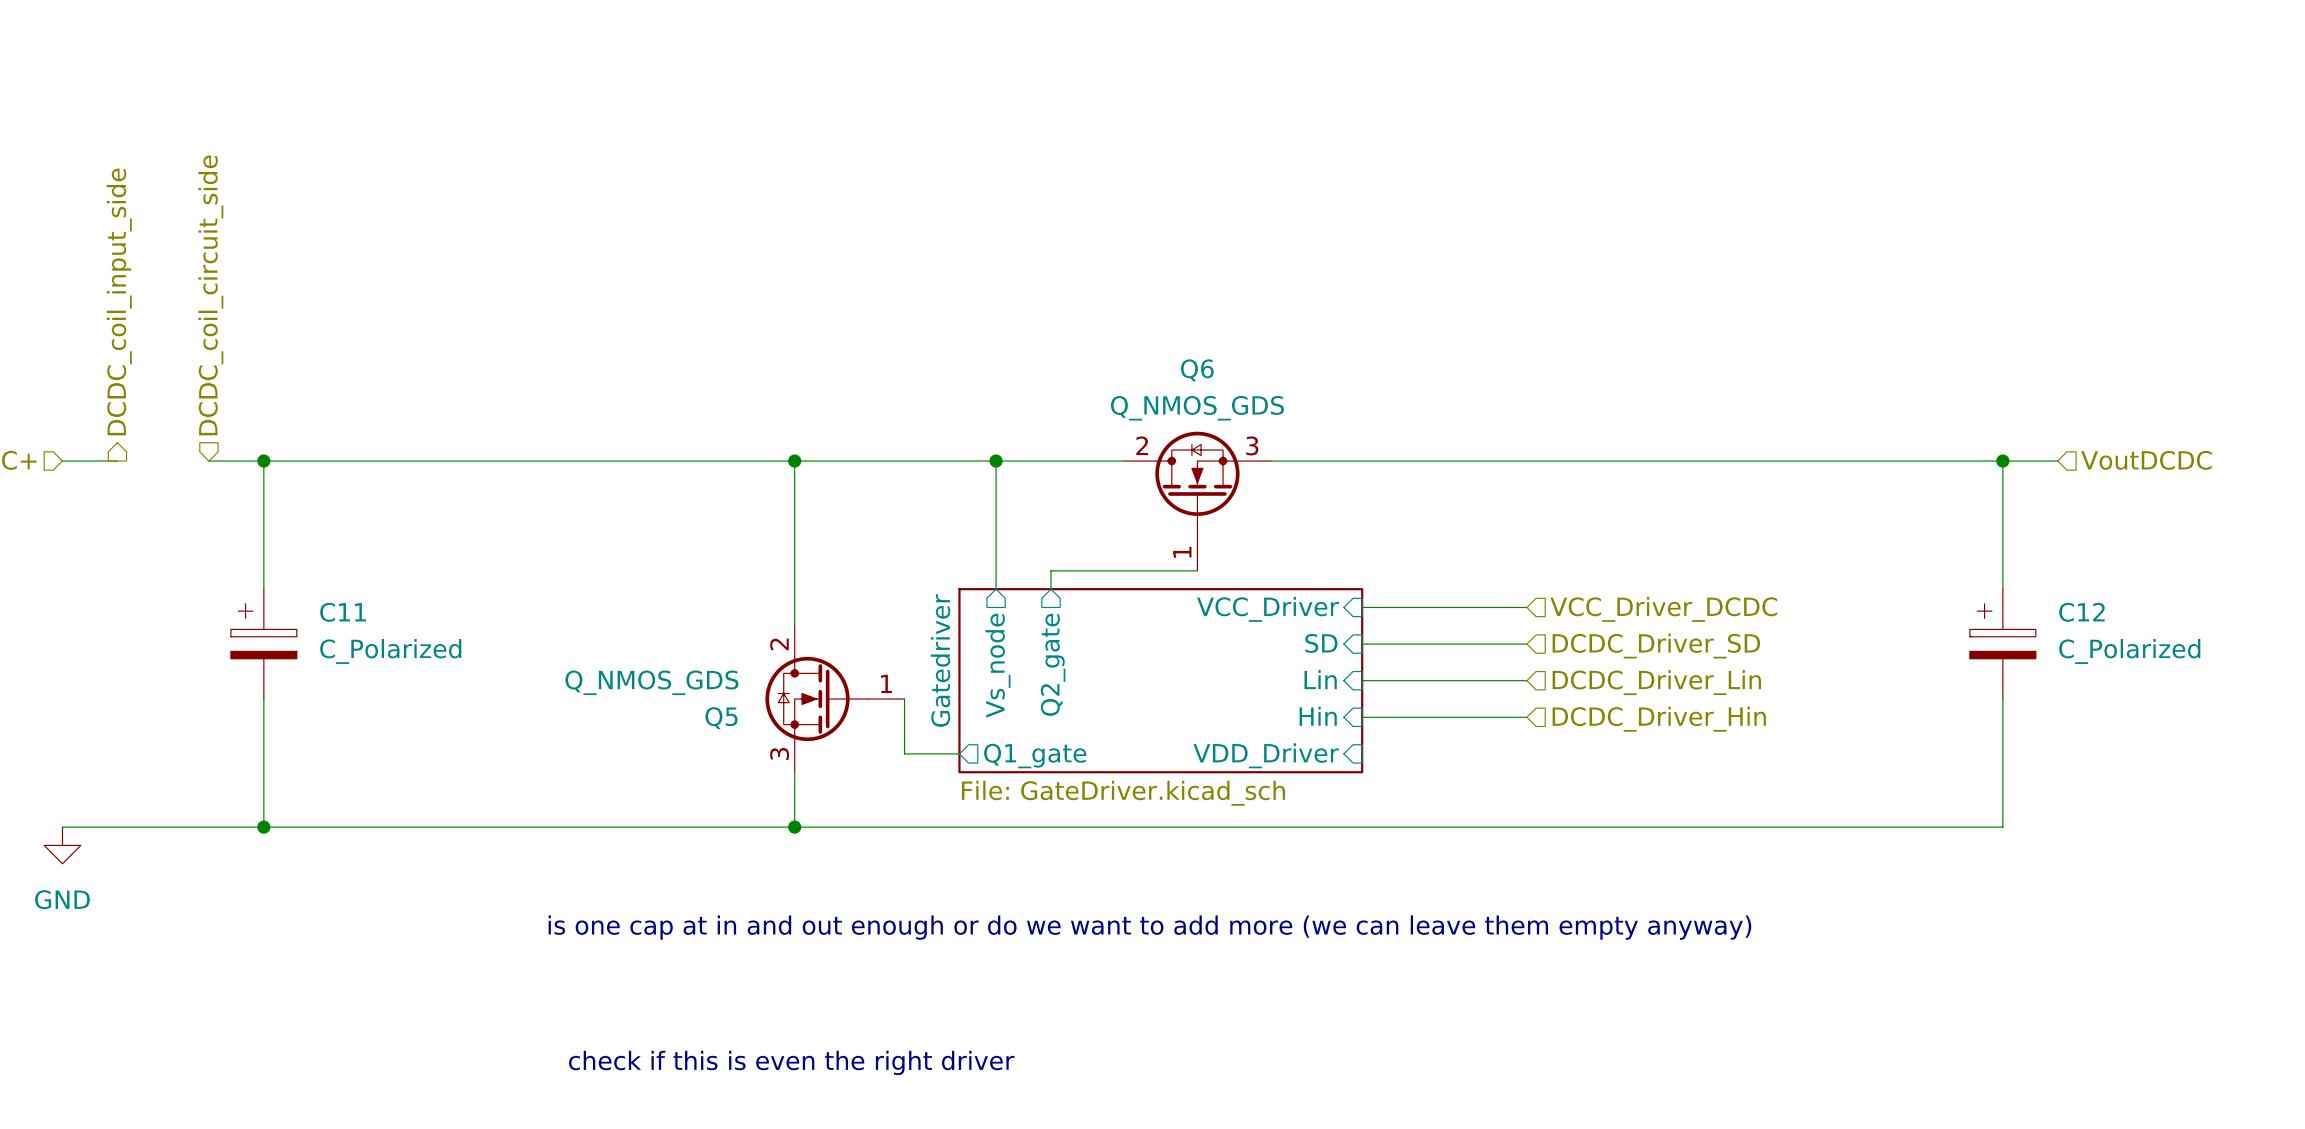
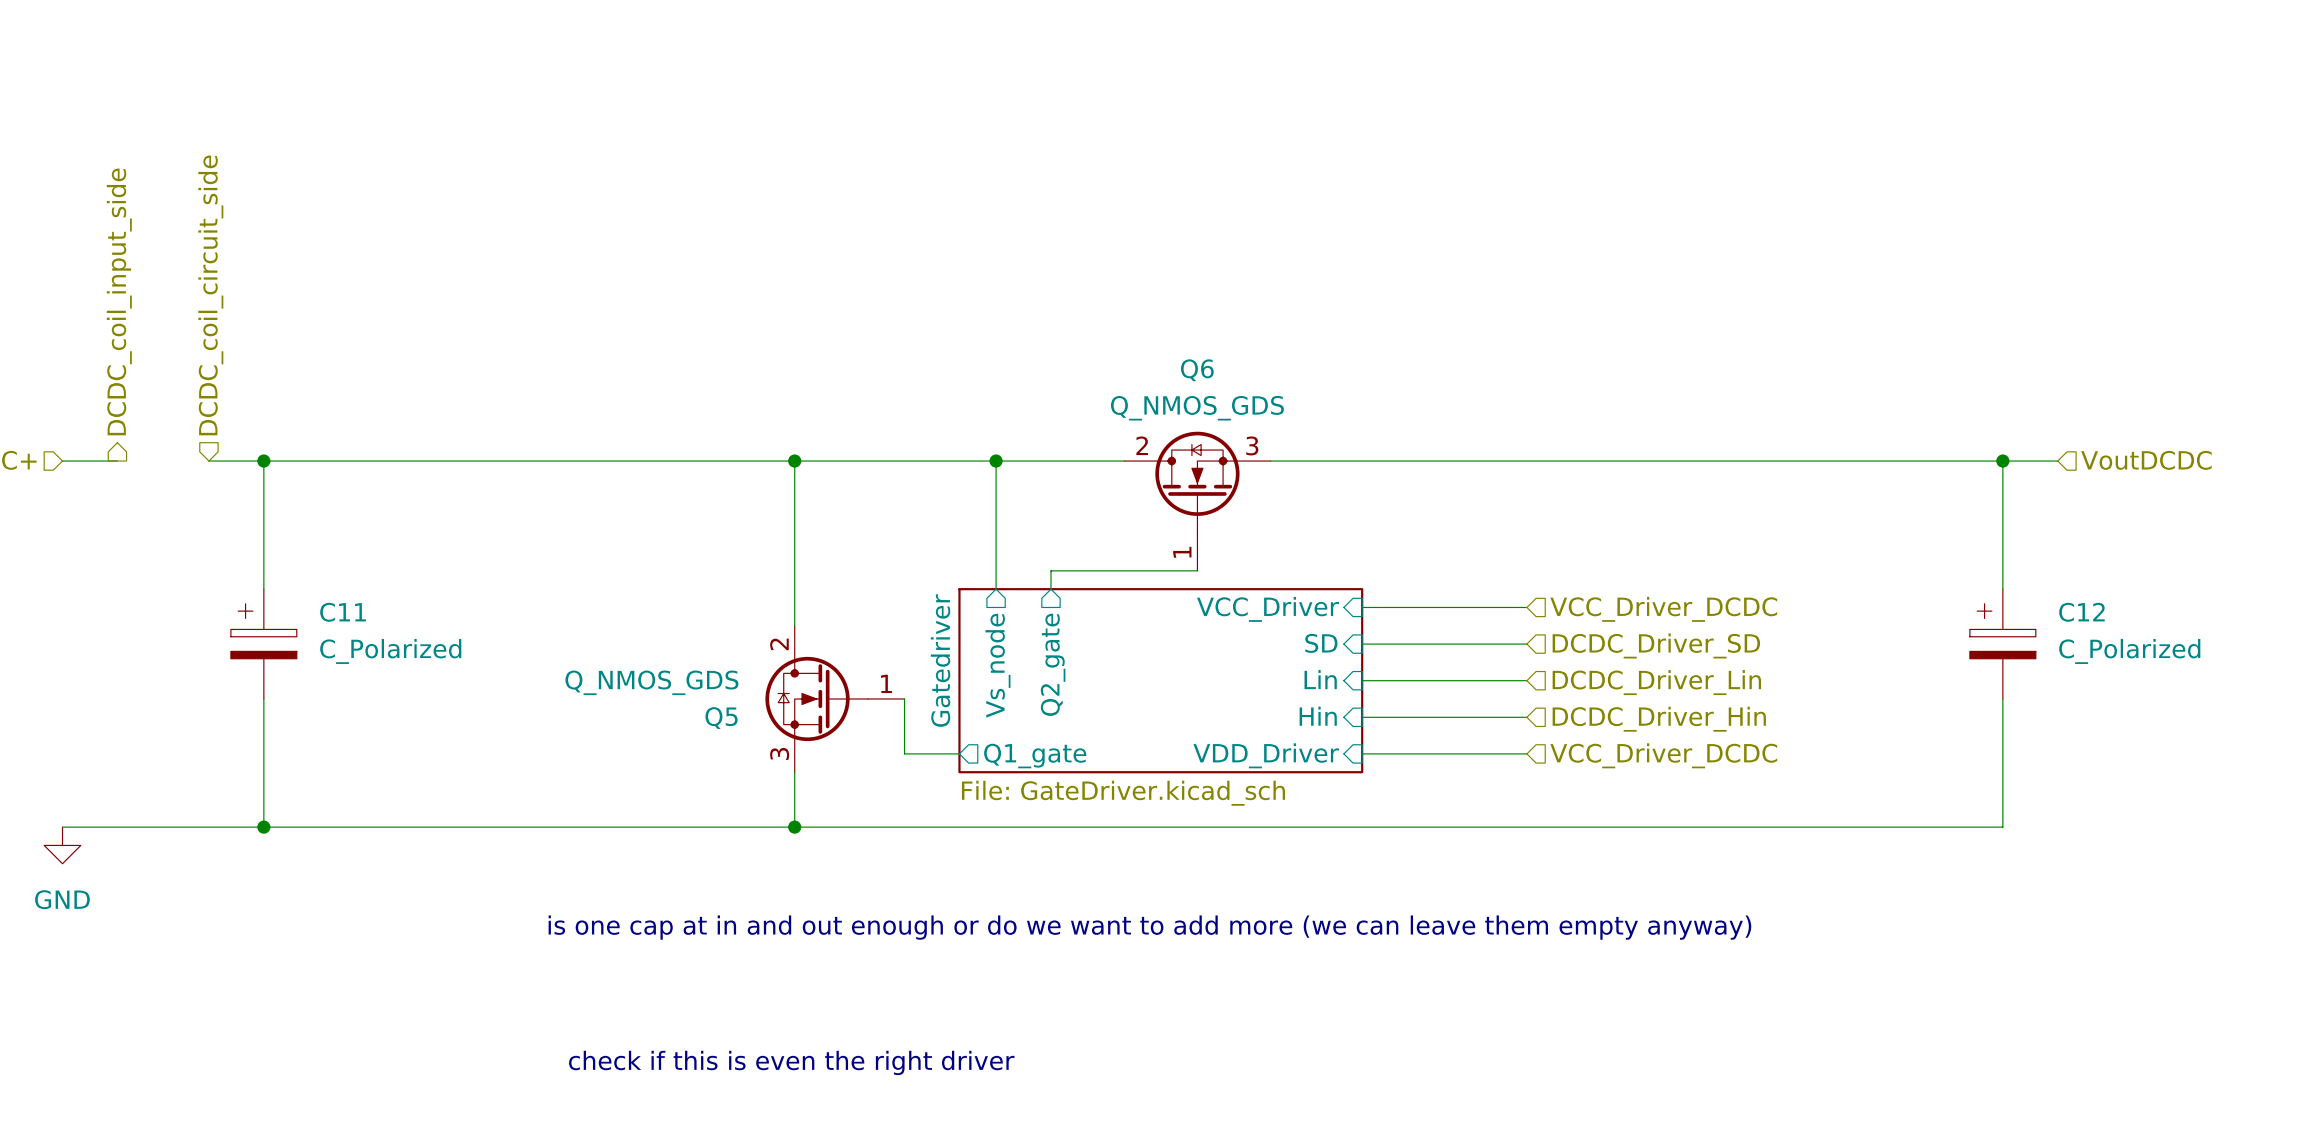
wire: none -> (1362, 753) (1526, 753)
hierarchical label: none -> VCC_Driver_DCDC (1663, 755)

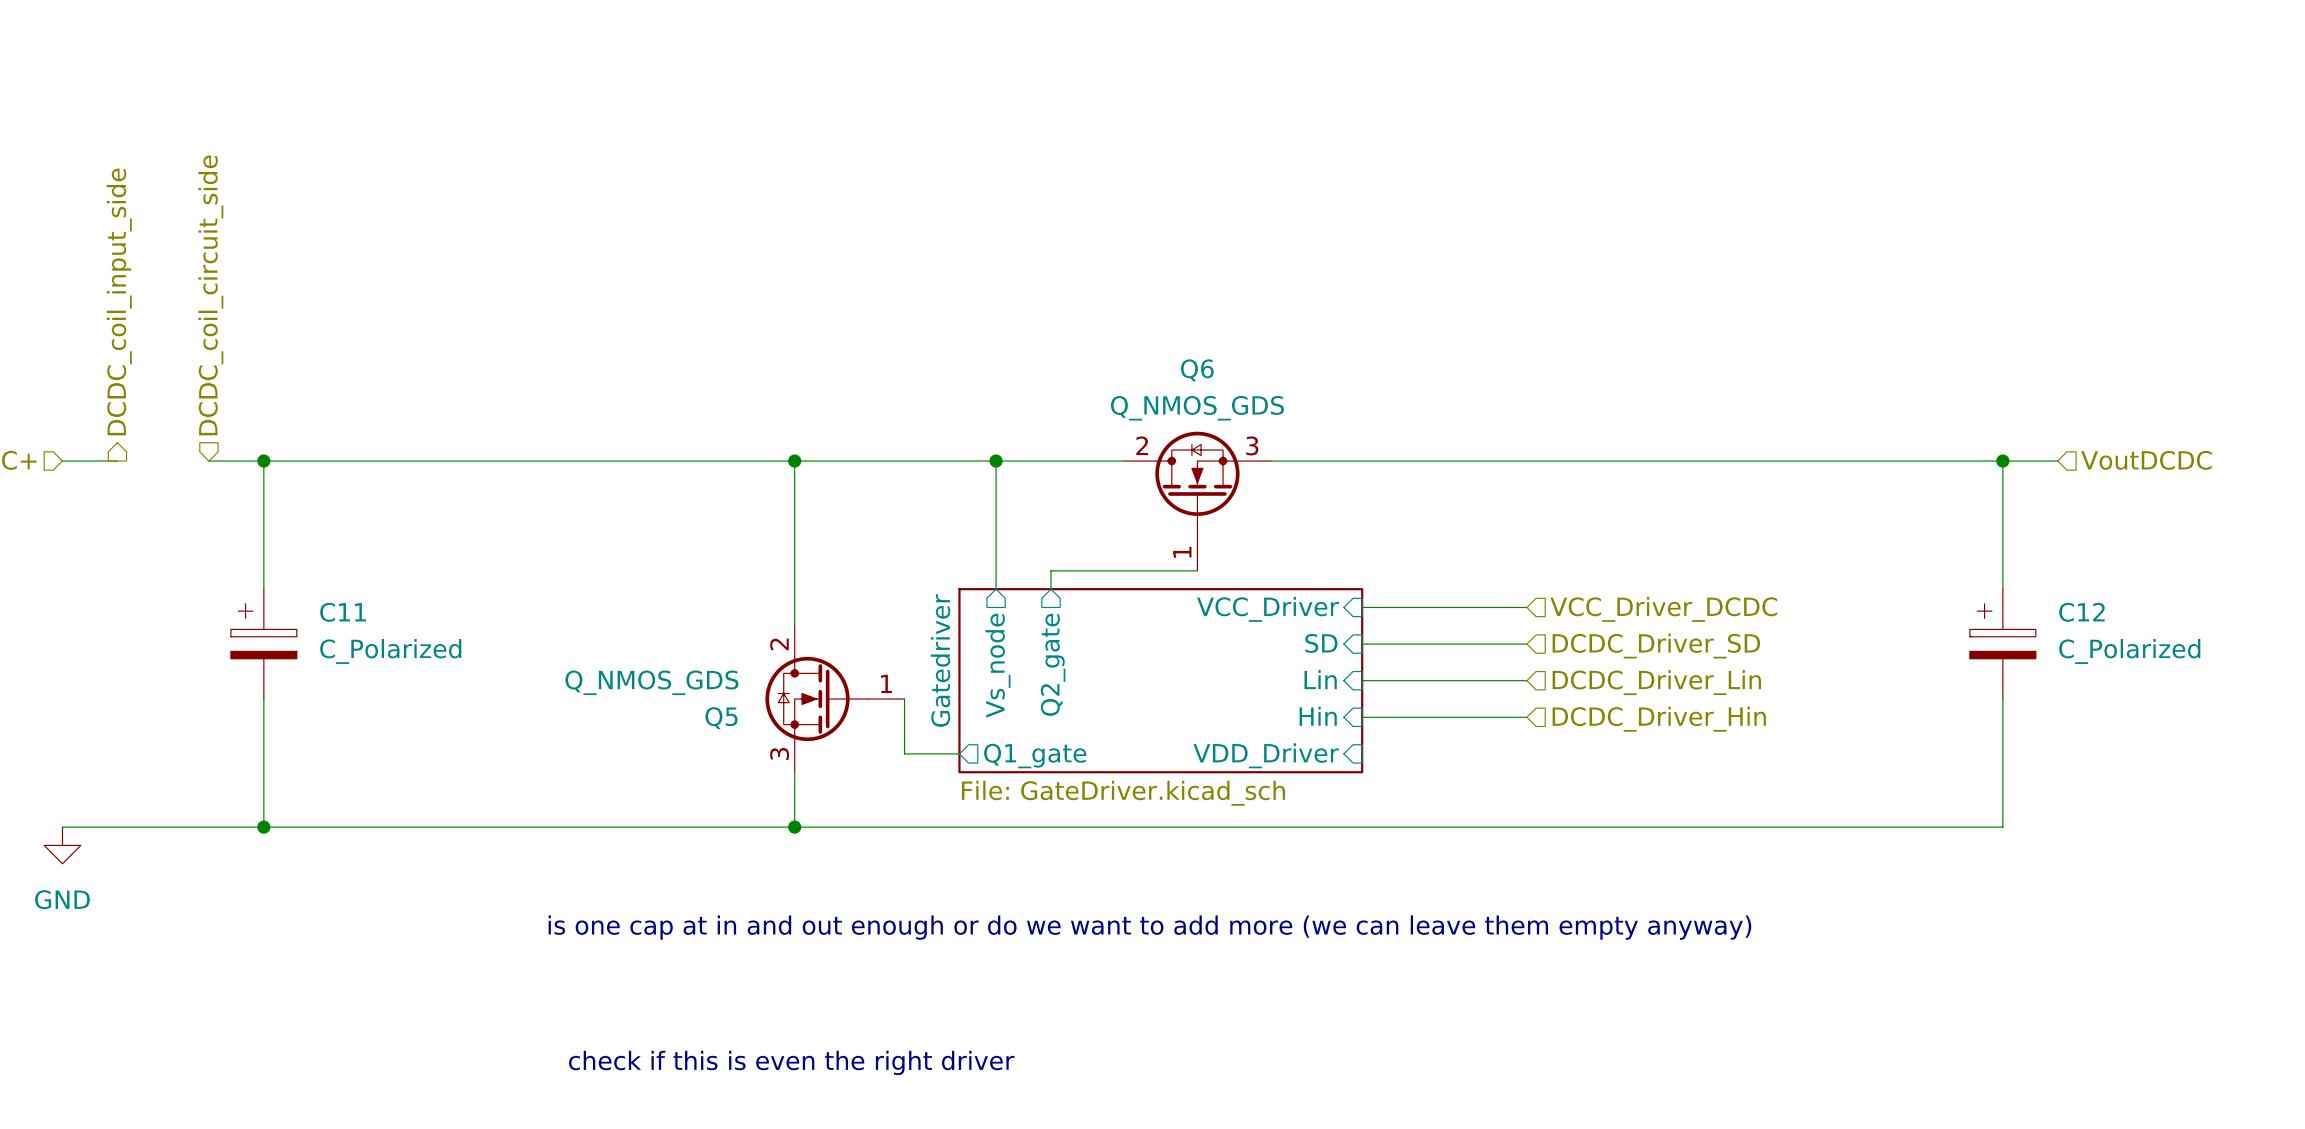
wire: (1362, 753) (1526, 753) -> none
hierarchical label: VCC_Driver_DCDC (1663, 755) -> none

